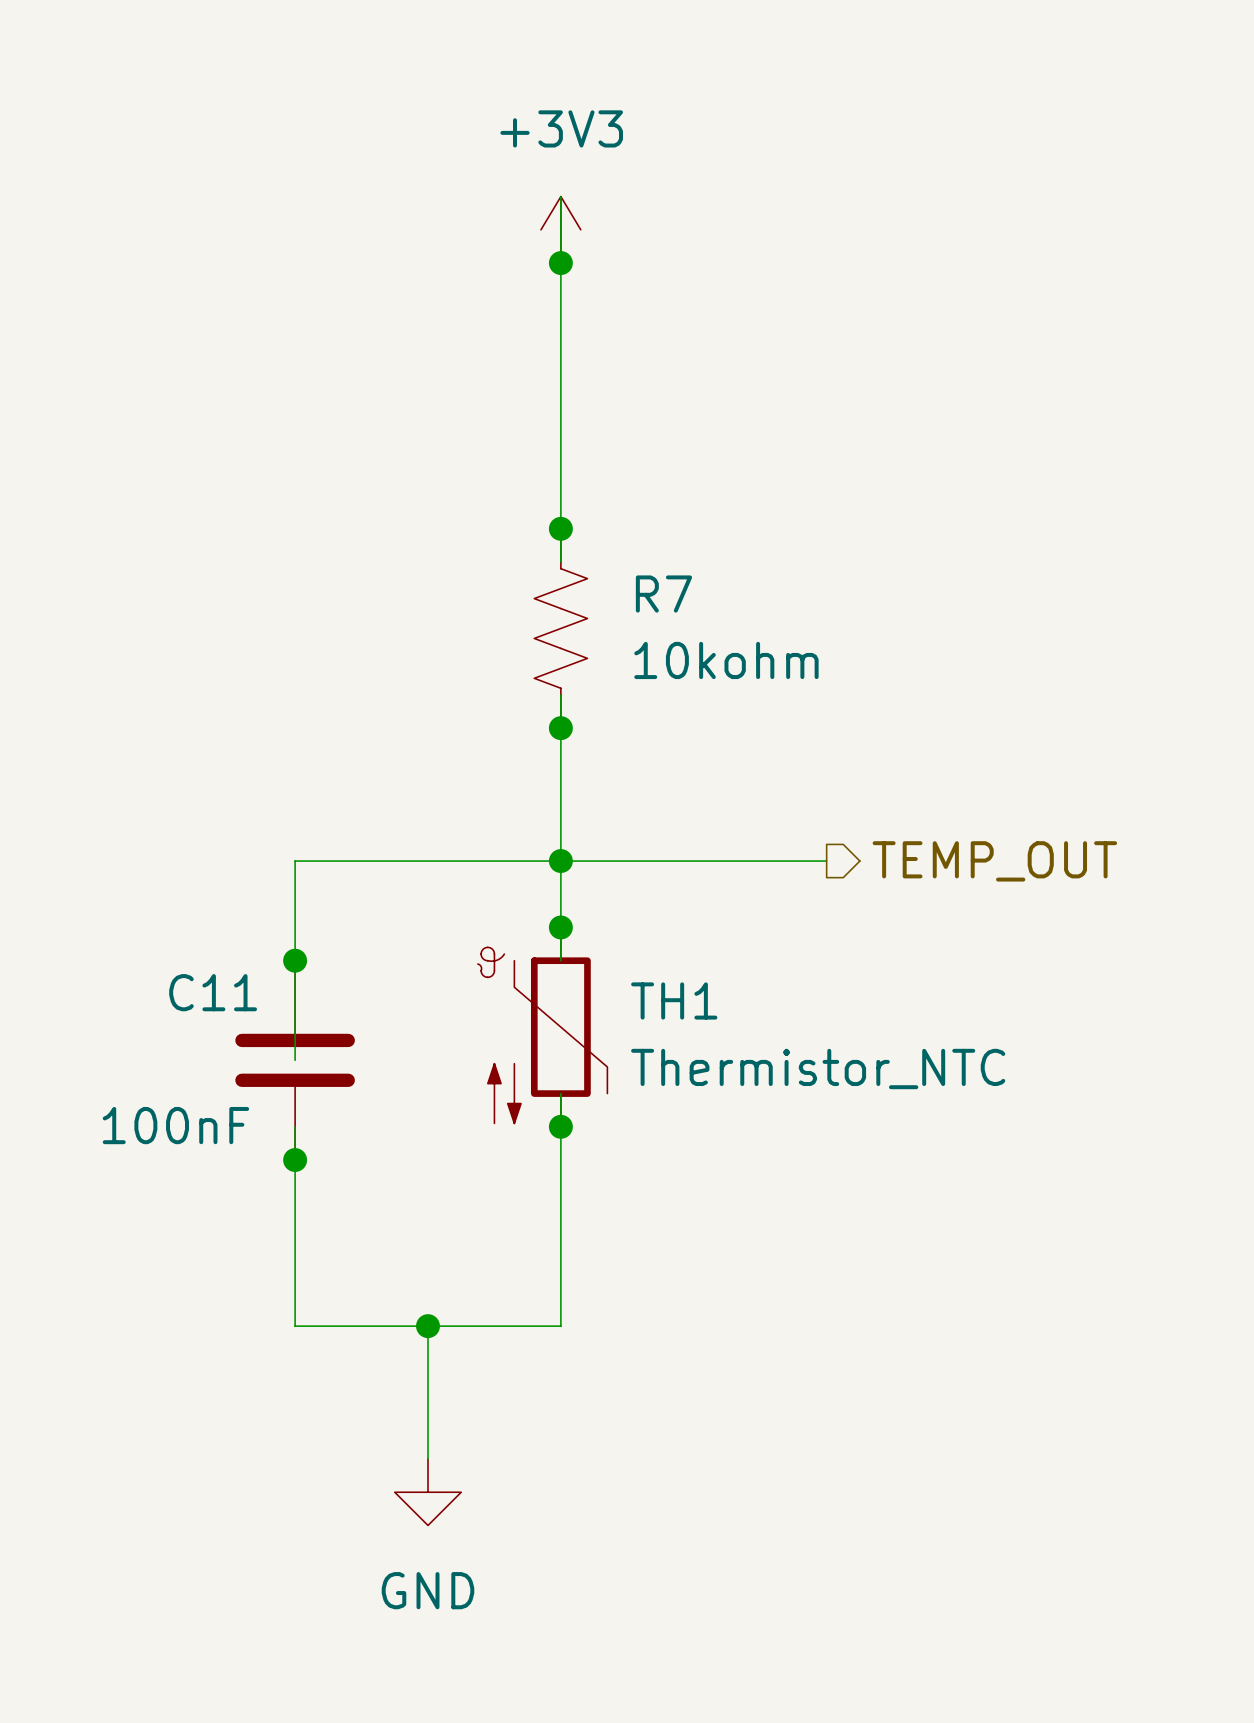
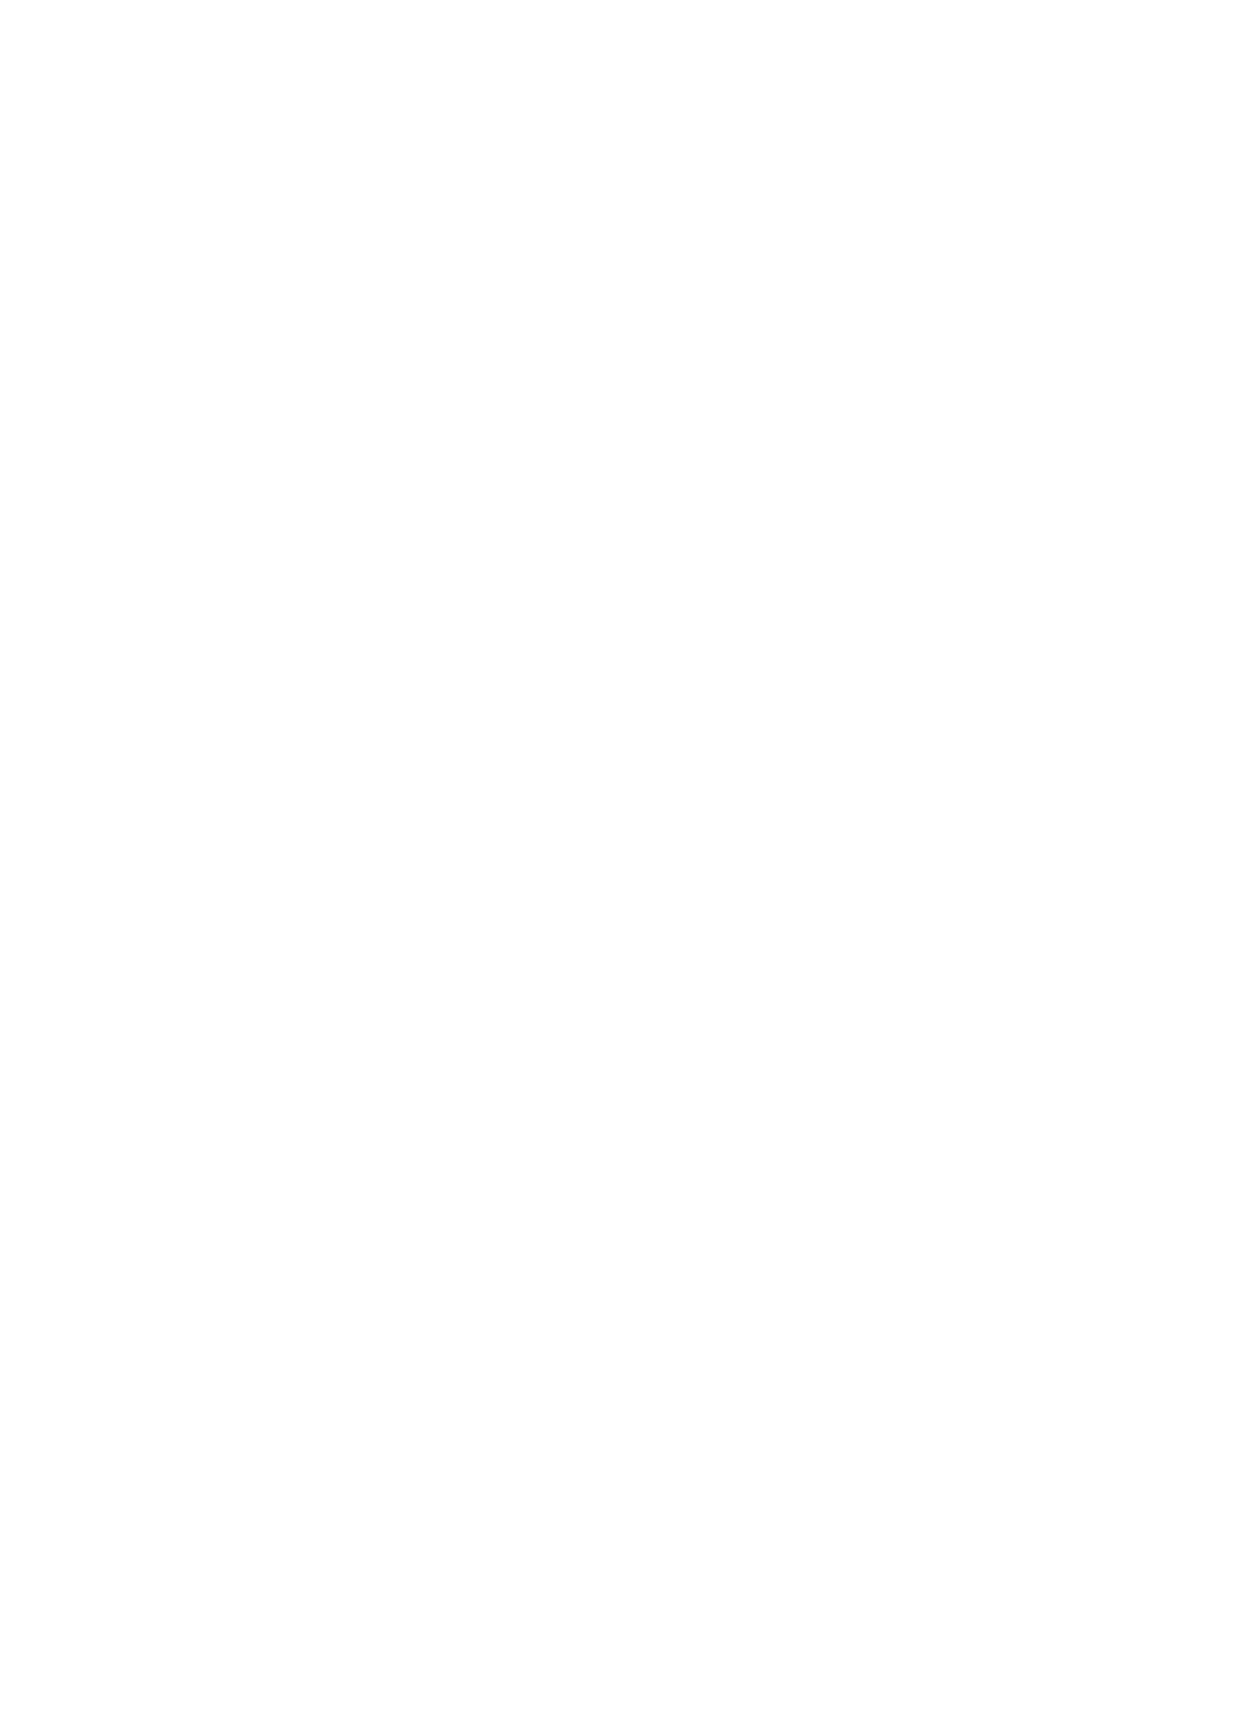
wire: (560, 196) (560, 562) -> none
power symbol: +3V3 (560, 229) -> none
junction: (560, 263) -> none
junction: (560, 528) -> none
R7: 10kohm (560, 628) -> none
wire: (560, 694) (560, 960) -> none
junction: (560, 728) -> none
junction: (560, 861) -> none
wire: (826, 861) (295, 861) (295, 1060) -> none
hierarchical label: TEMP_OUT (994, 861) -> none
junction: (560, 927) -> none
junction: (295, 960) -> none
TH1: Thermistor_NTC (542, 1027) -> none
C11: 100nF (295, 1060) -> none
wire: (560, 1093) (560, 1326) (295, 1326) (295, 1126) -> none
junction: (560, 1126) -> none
junction: (295, 1160) -> none
wire: (428, 1326) (428, 1459) -> none
junction: (428, 1326) -> none
power symbol: GND (428, 1492) -> none

